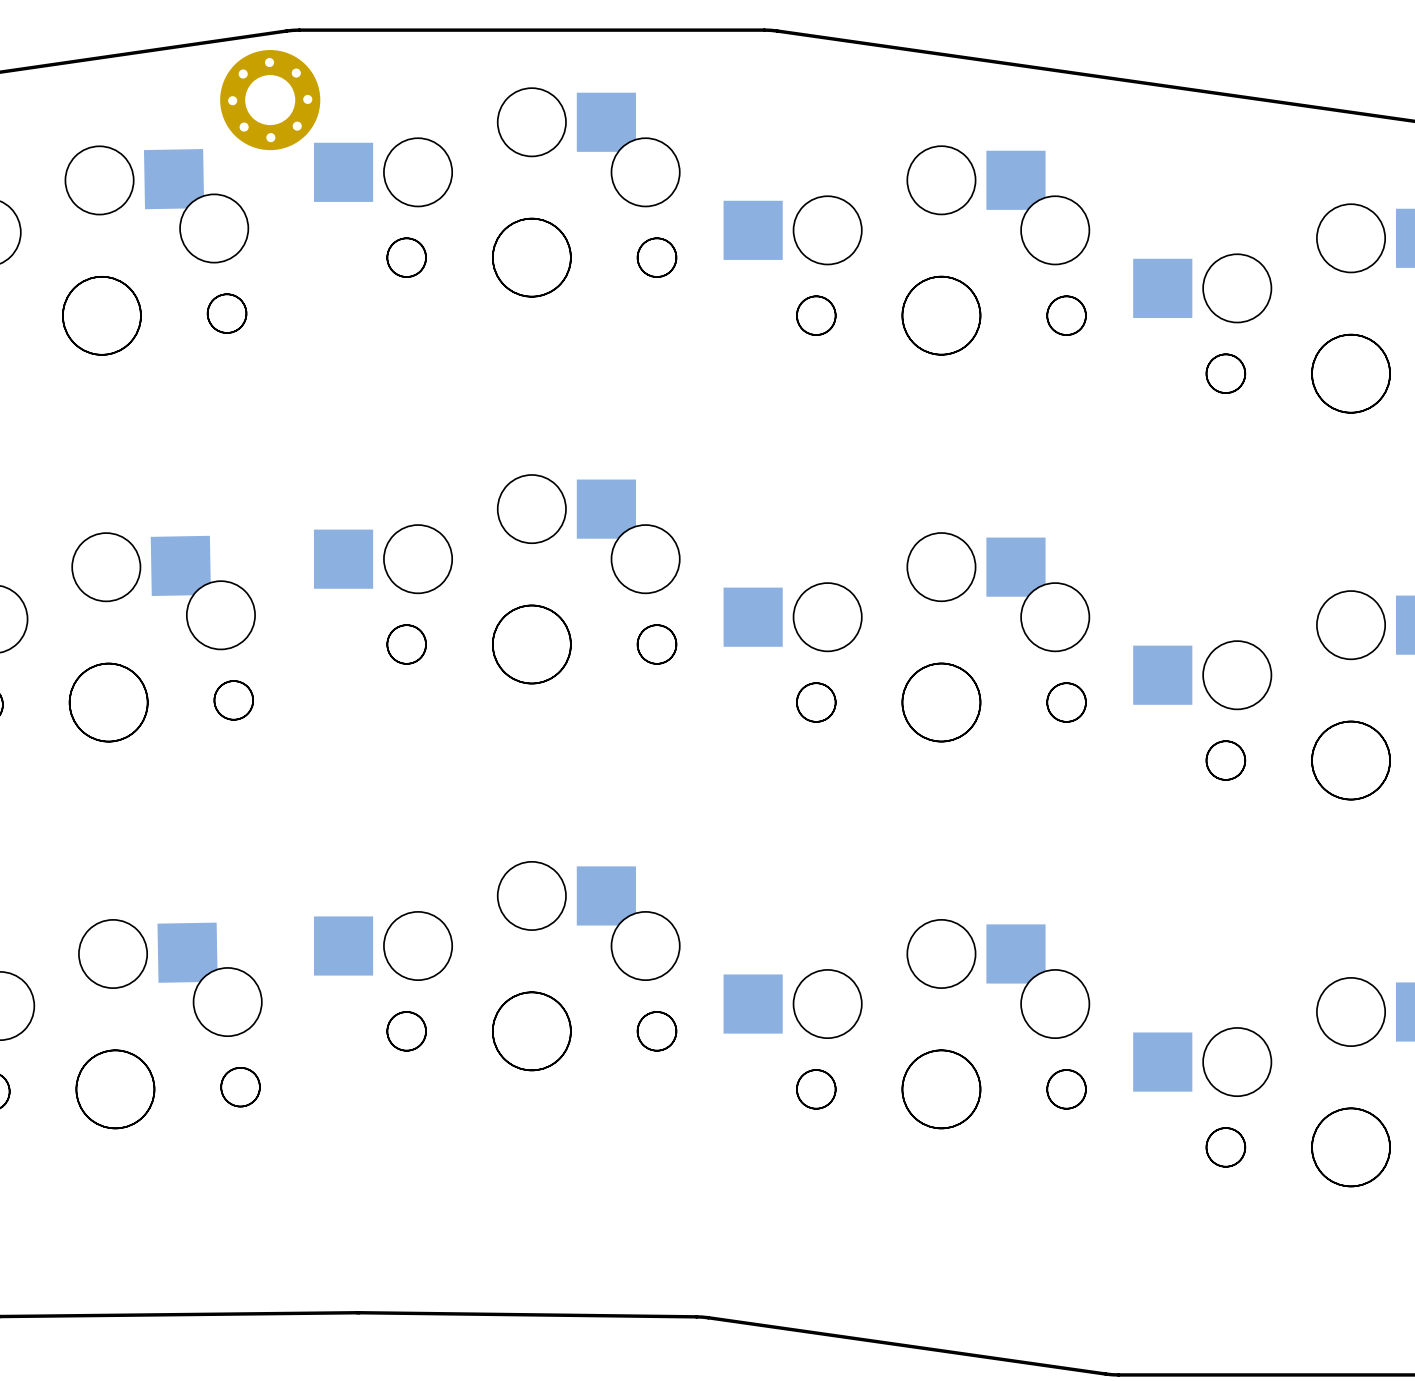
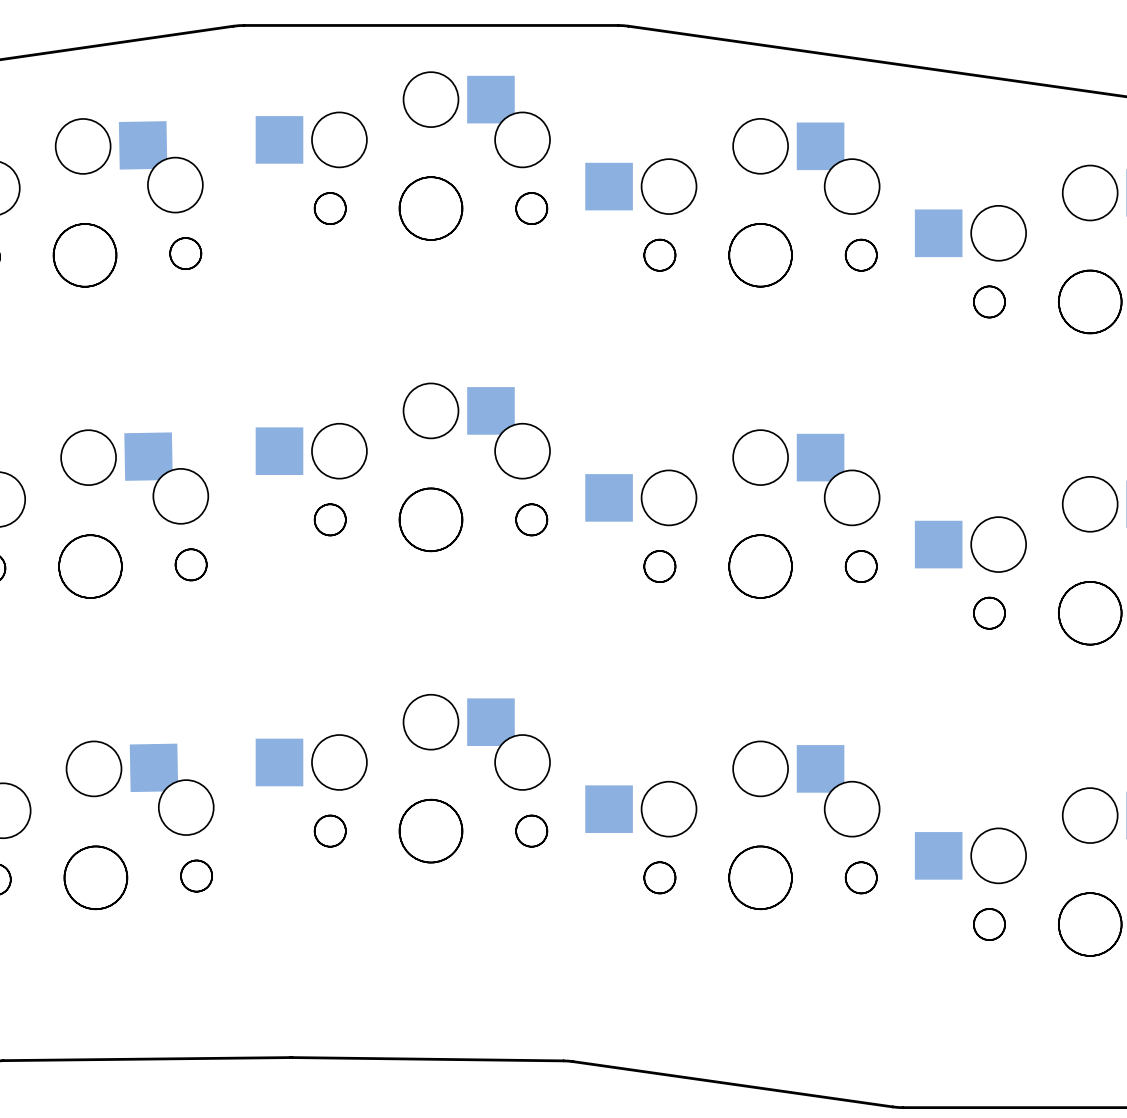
part: (270, 100) -> none

